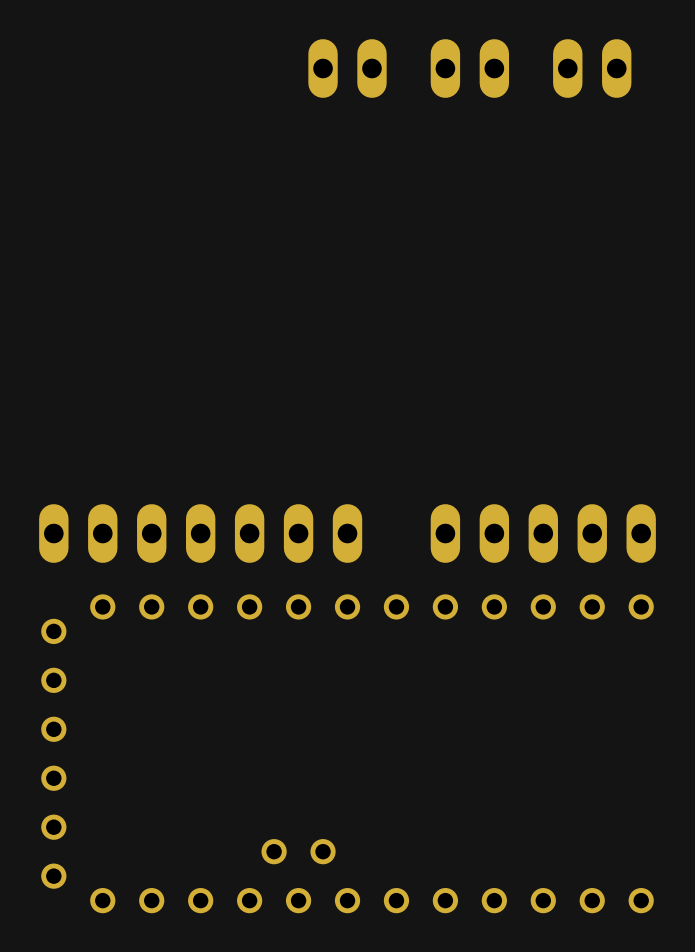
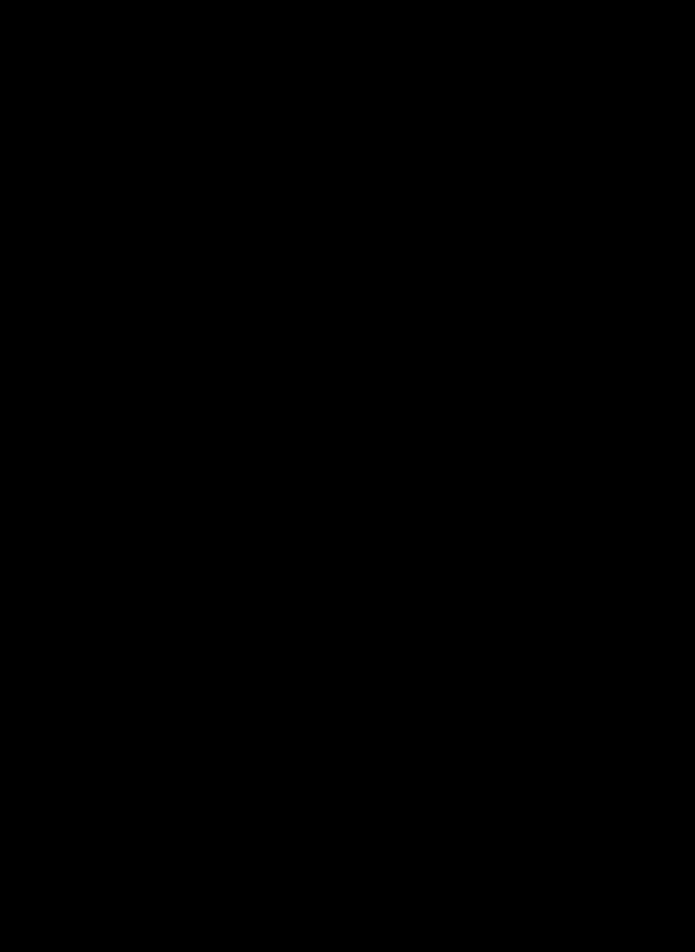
part: (347, 68) -> none
part: (469, 68) -> none
part: (592, 68) -> none
part: (200, 533) -> none
part: (543, 533) -> none
part: (347, 753) -> none

